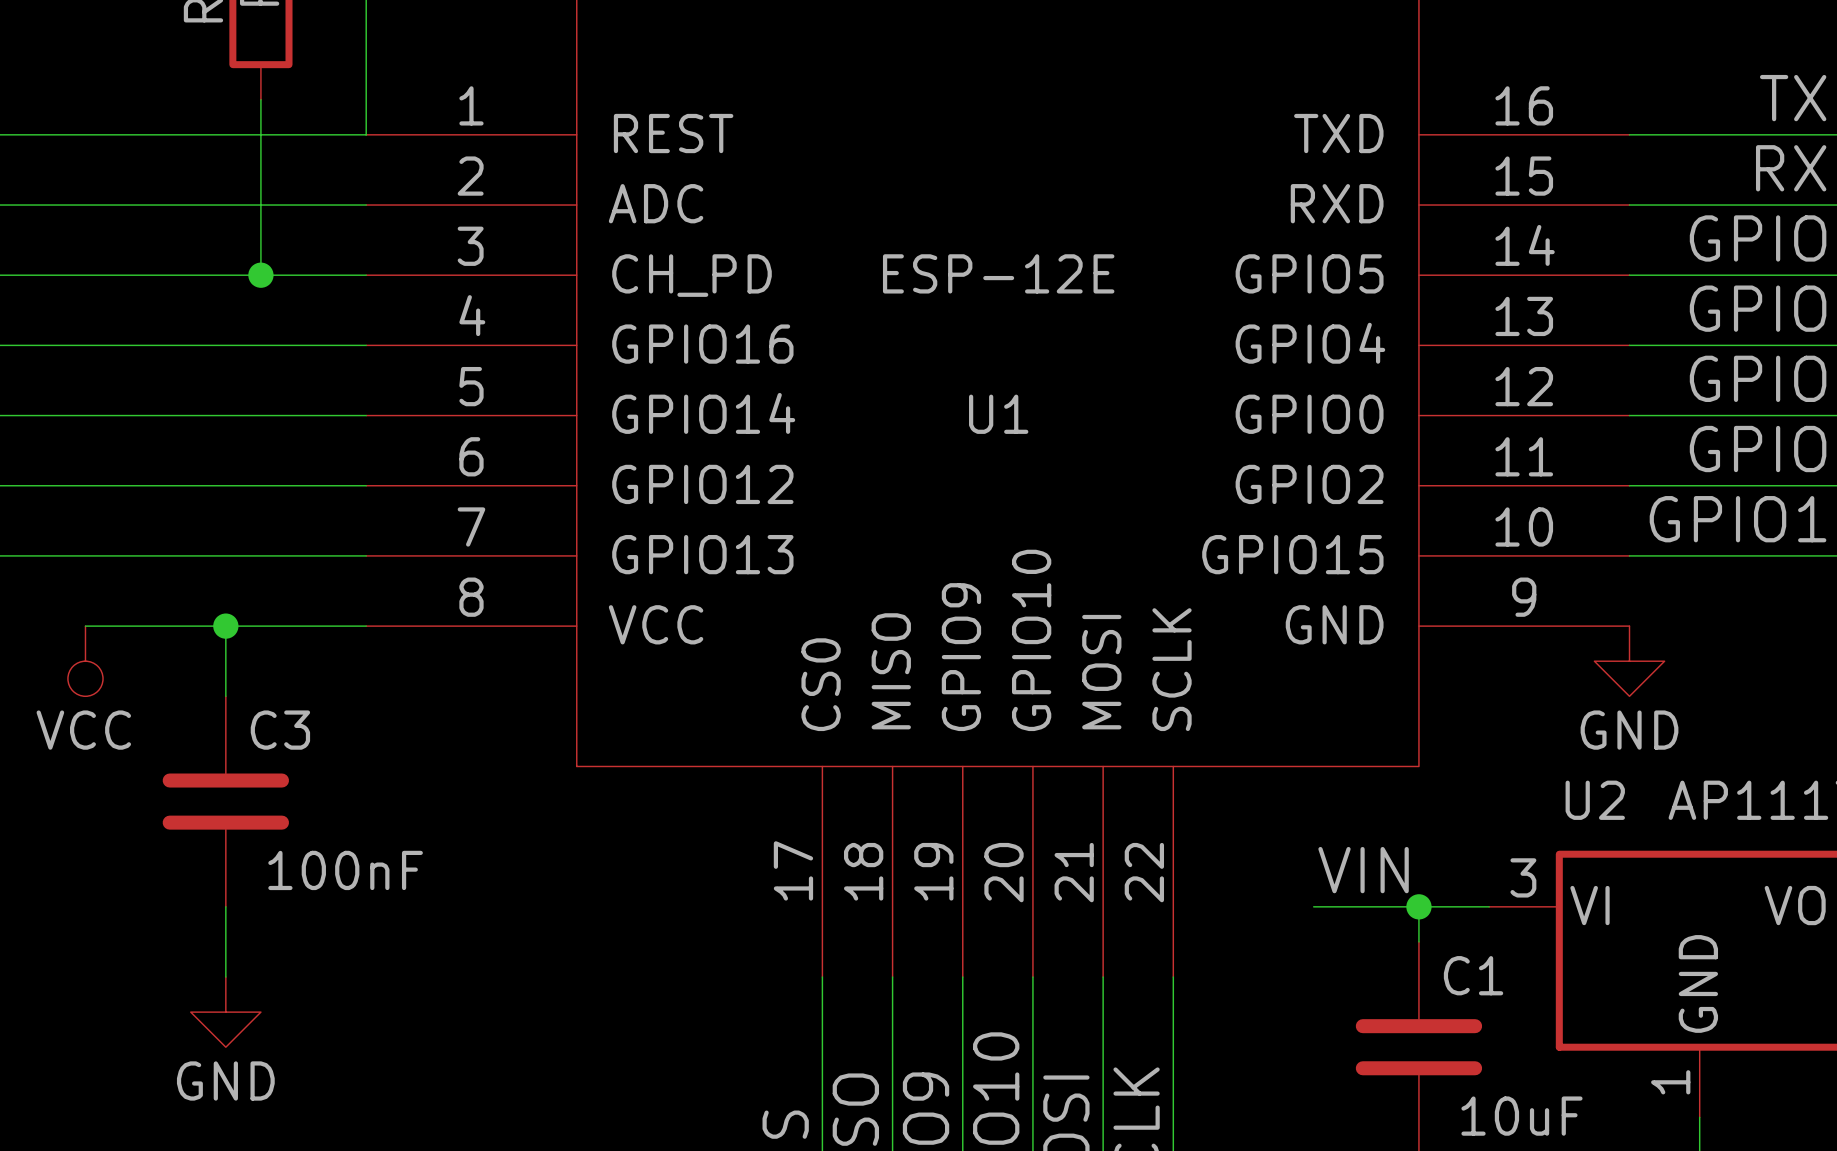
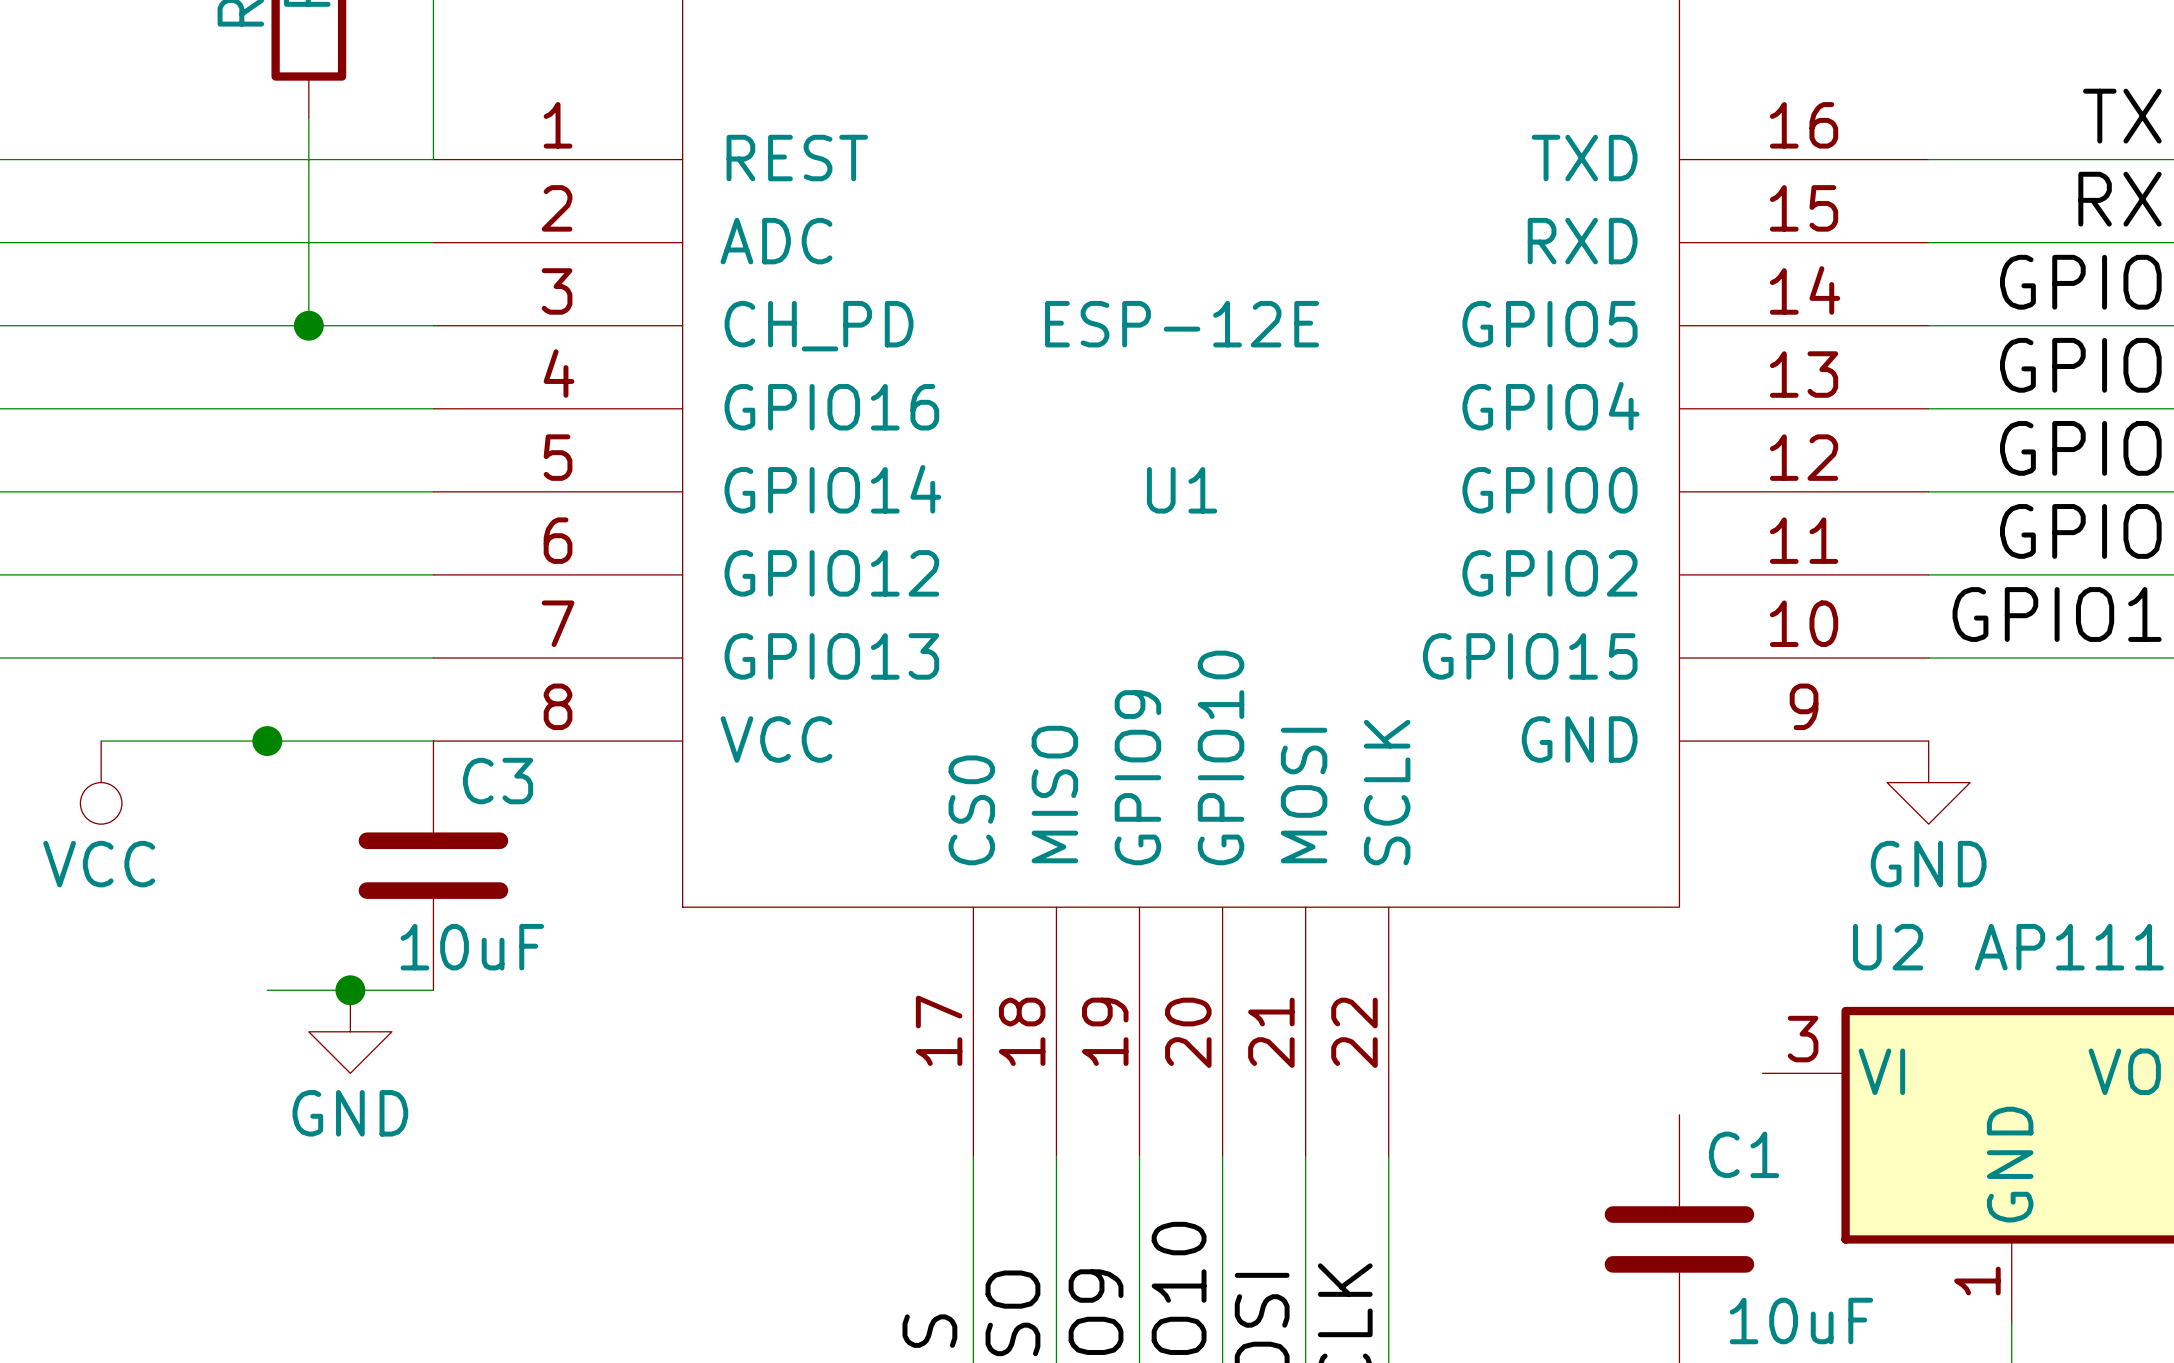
wire: (225, 626) (225, 696) -> none
C3 position: (225, 801) -> (433, 865)
wire: none -> (267, 990) (433, 990)
junction: none -> (350, 990)
C3 value: 100nF (345, 870) -> 10uF (472, 947)
label: VIN (1363, 870) -> none
wire: (225, 906) (225, 977) -> none
wire: (1313, 906) (1489, 906) -> none
wire: (1418, 906) (1418, 941) -> none
junction: (1418, 906) -> none
power symbol position: GND (225, 1012) -> GND (350, 1031)

